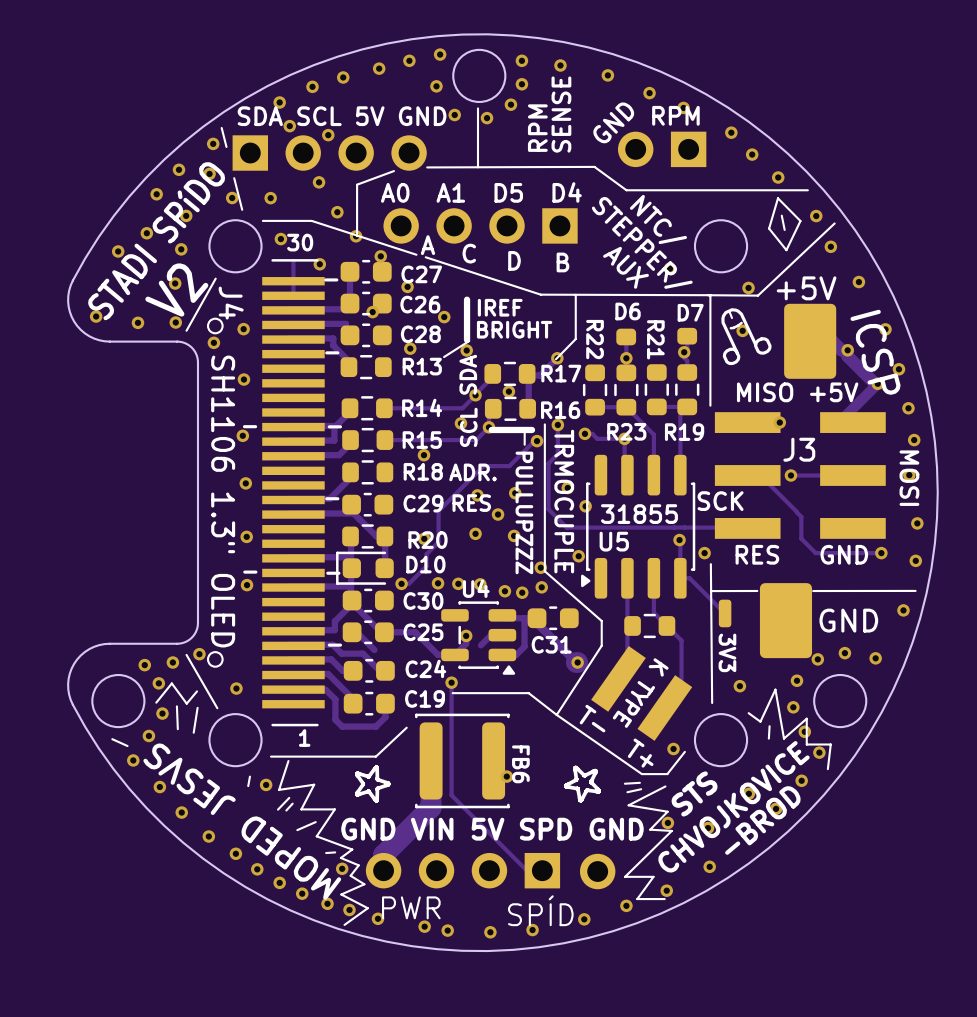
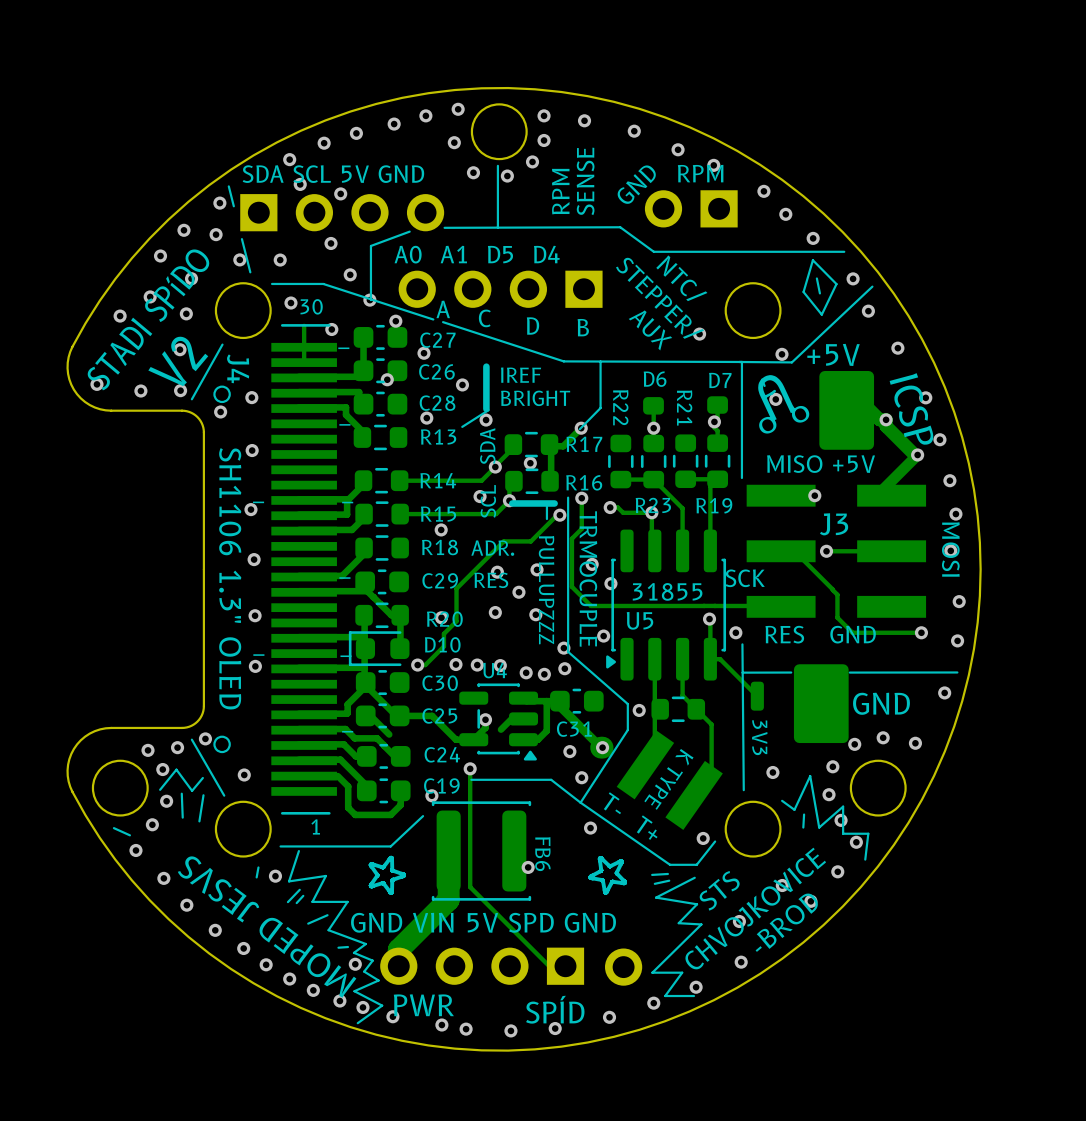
via: none -> (639, 710)
via: none -> (569, 751)
via: none -> (581, 777)
via: none -> (431, 795)
via: none -> (590, 828)
via: (667, 822) -> none

